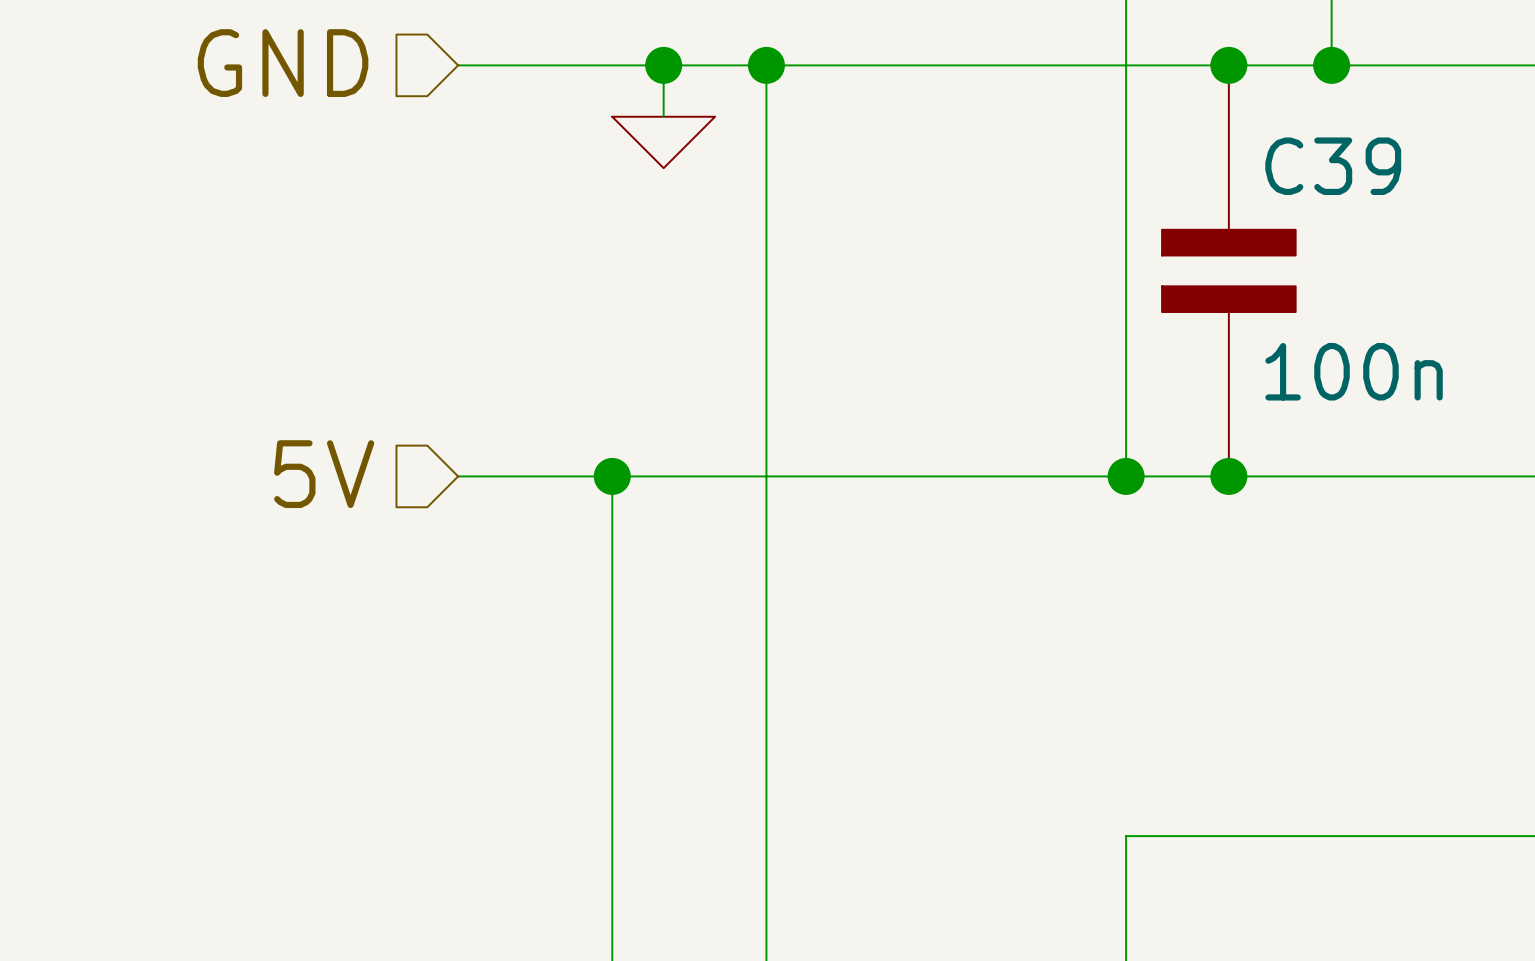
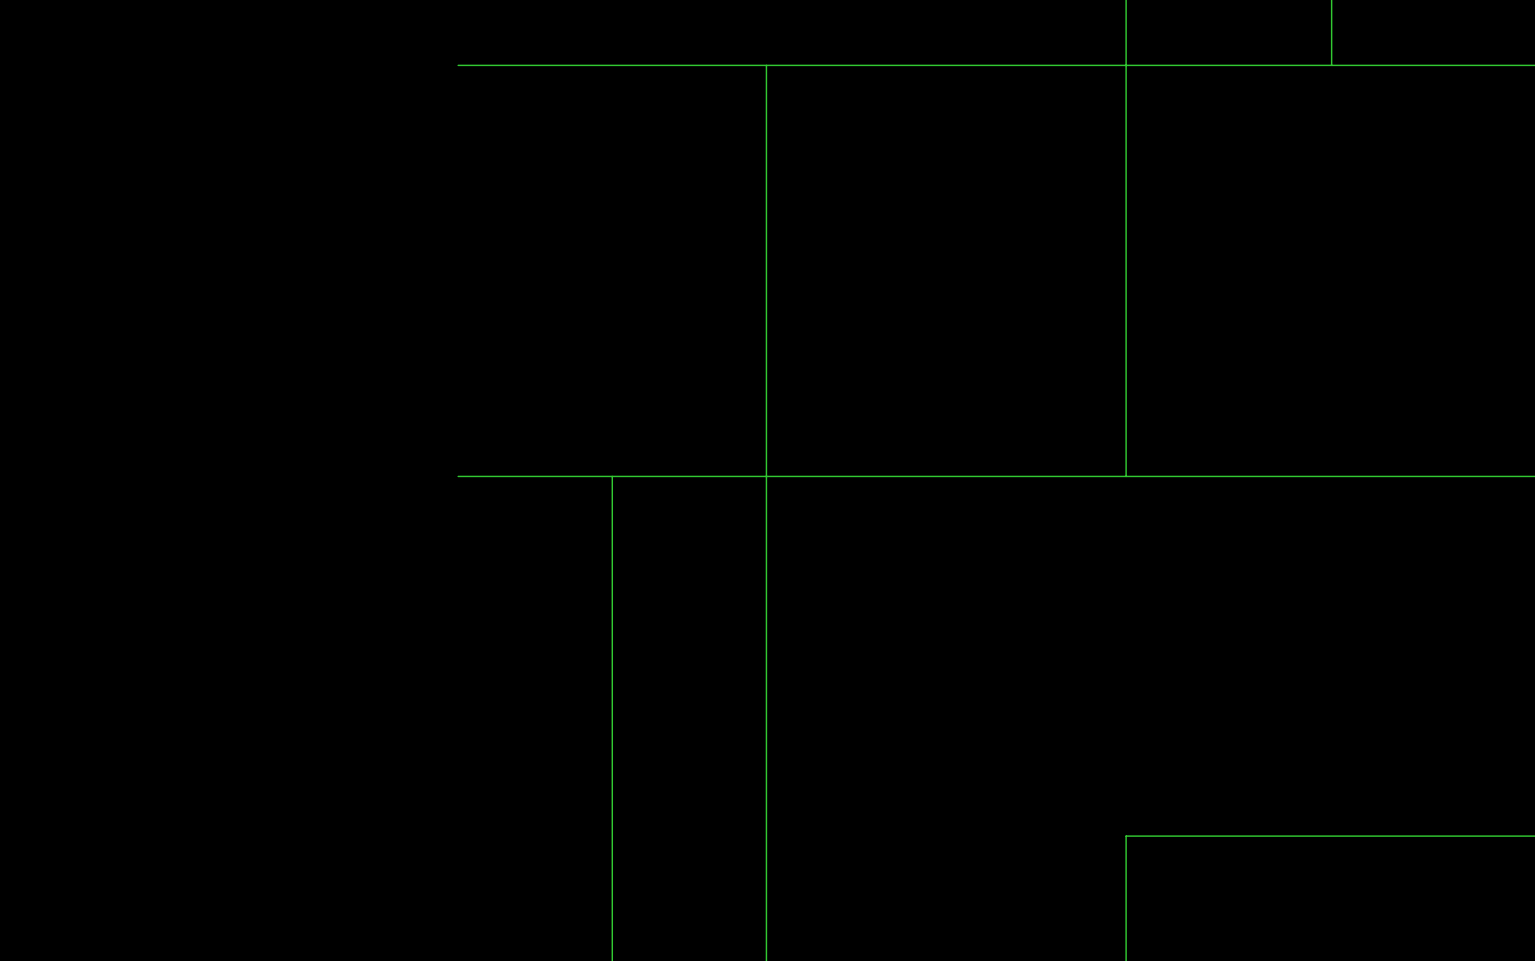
hierarchical label: GND (283, 63) -> none
wire: (663, 65) (663, 116) -> none
junction: (663, 65) -> none
junction: (766, 65) -> none
junction: (1228, 65) -> none
junction: (1331, 65) -> none
power symbol: (663, 142) -> none
C39: 100n (1228, 270) -> none
hierarchical label: 5V (324, 474) -> none
junction: (612, 476) -> none
junction: (1126, 476) -> none
junction: (1228, 476) -> none

